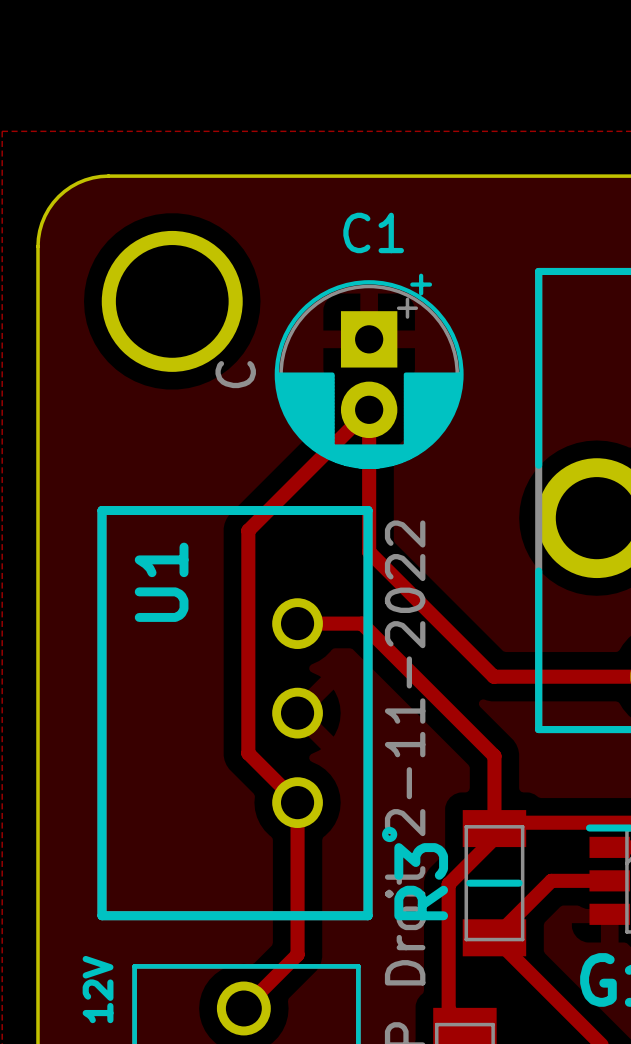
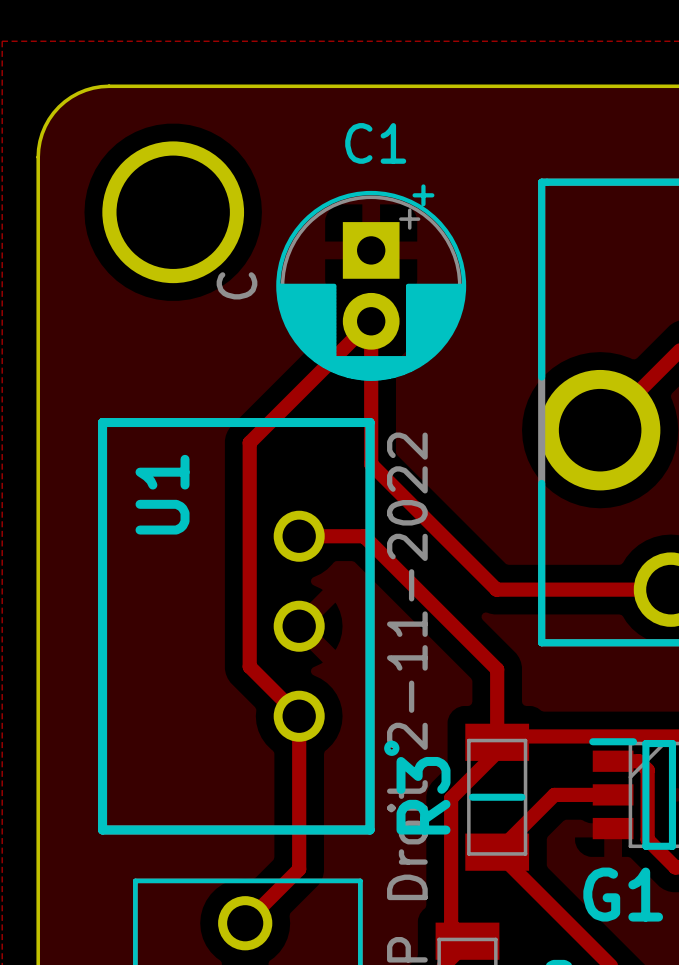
text: 12V (98, 989) -> none

